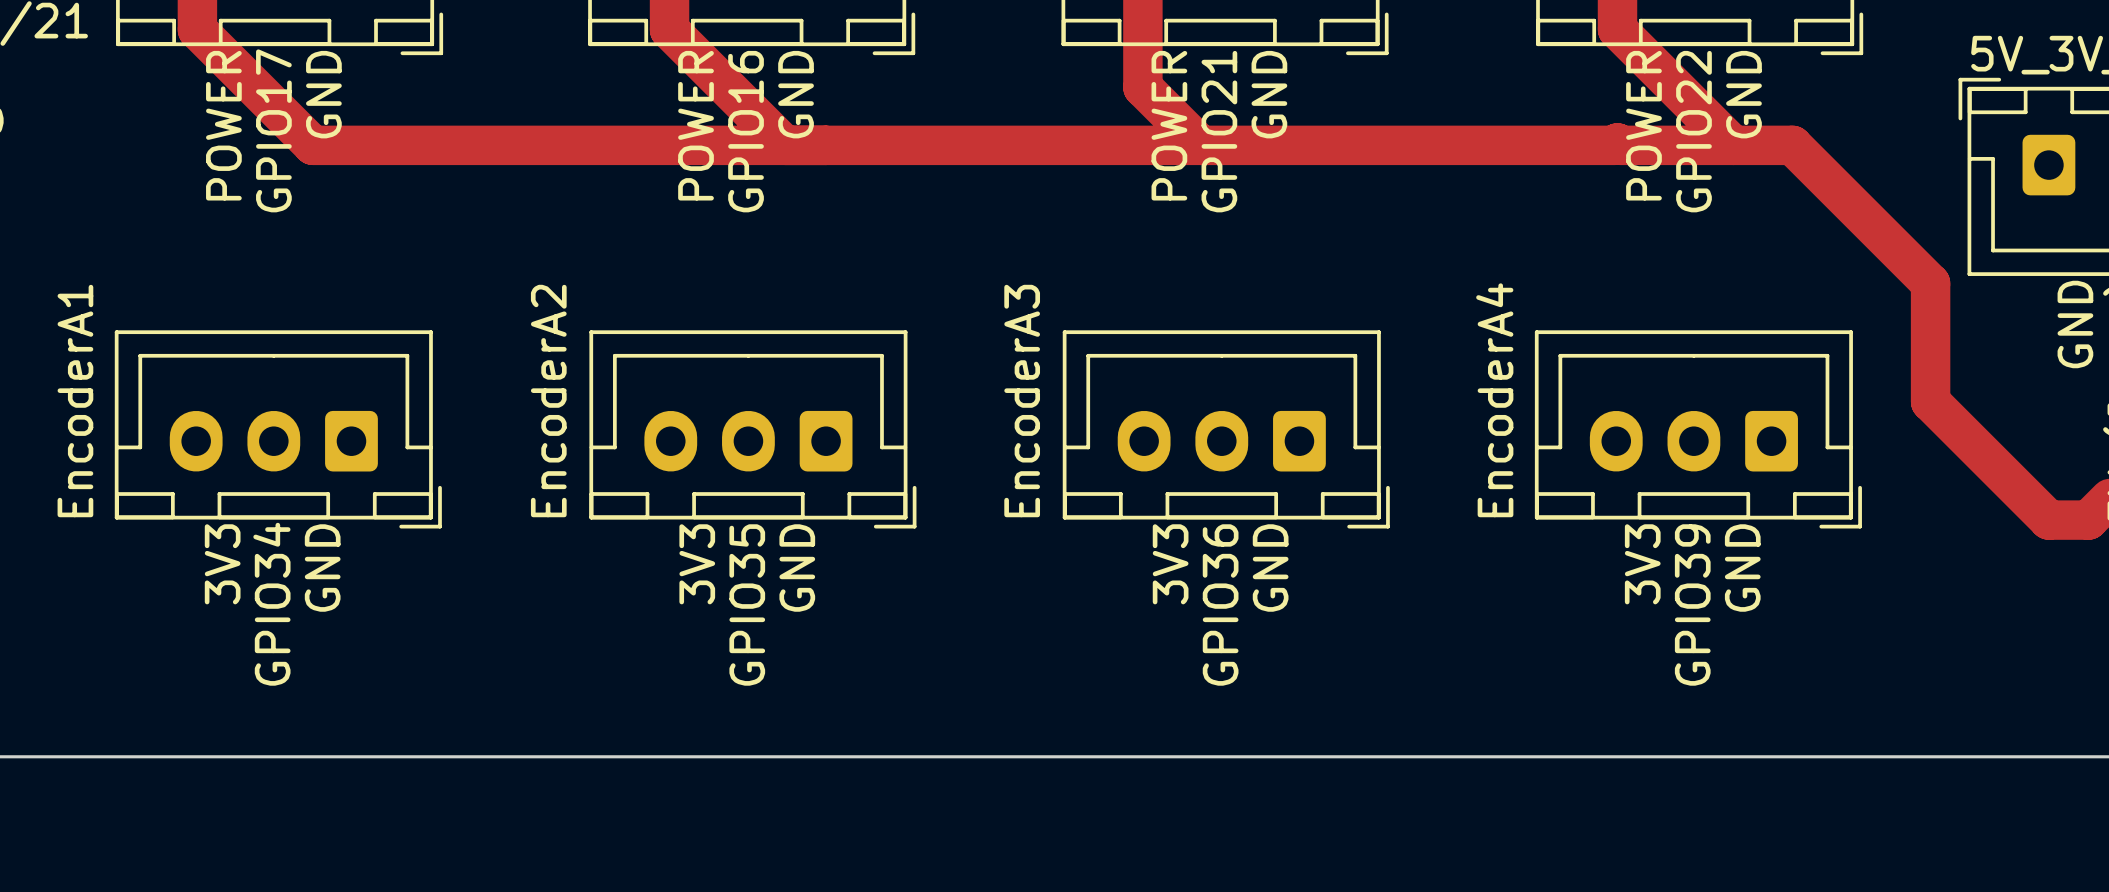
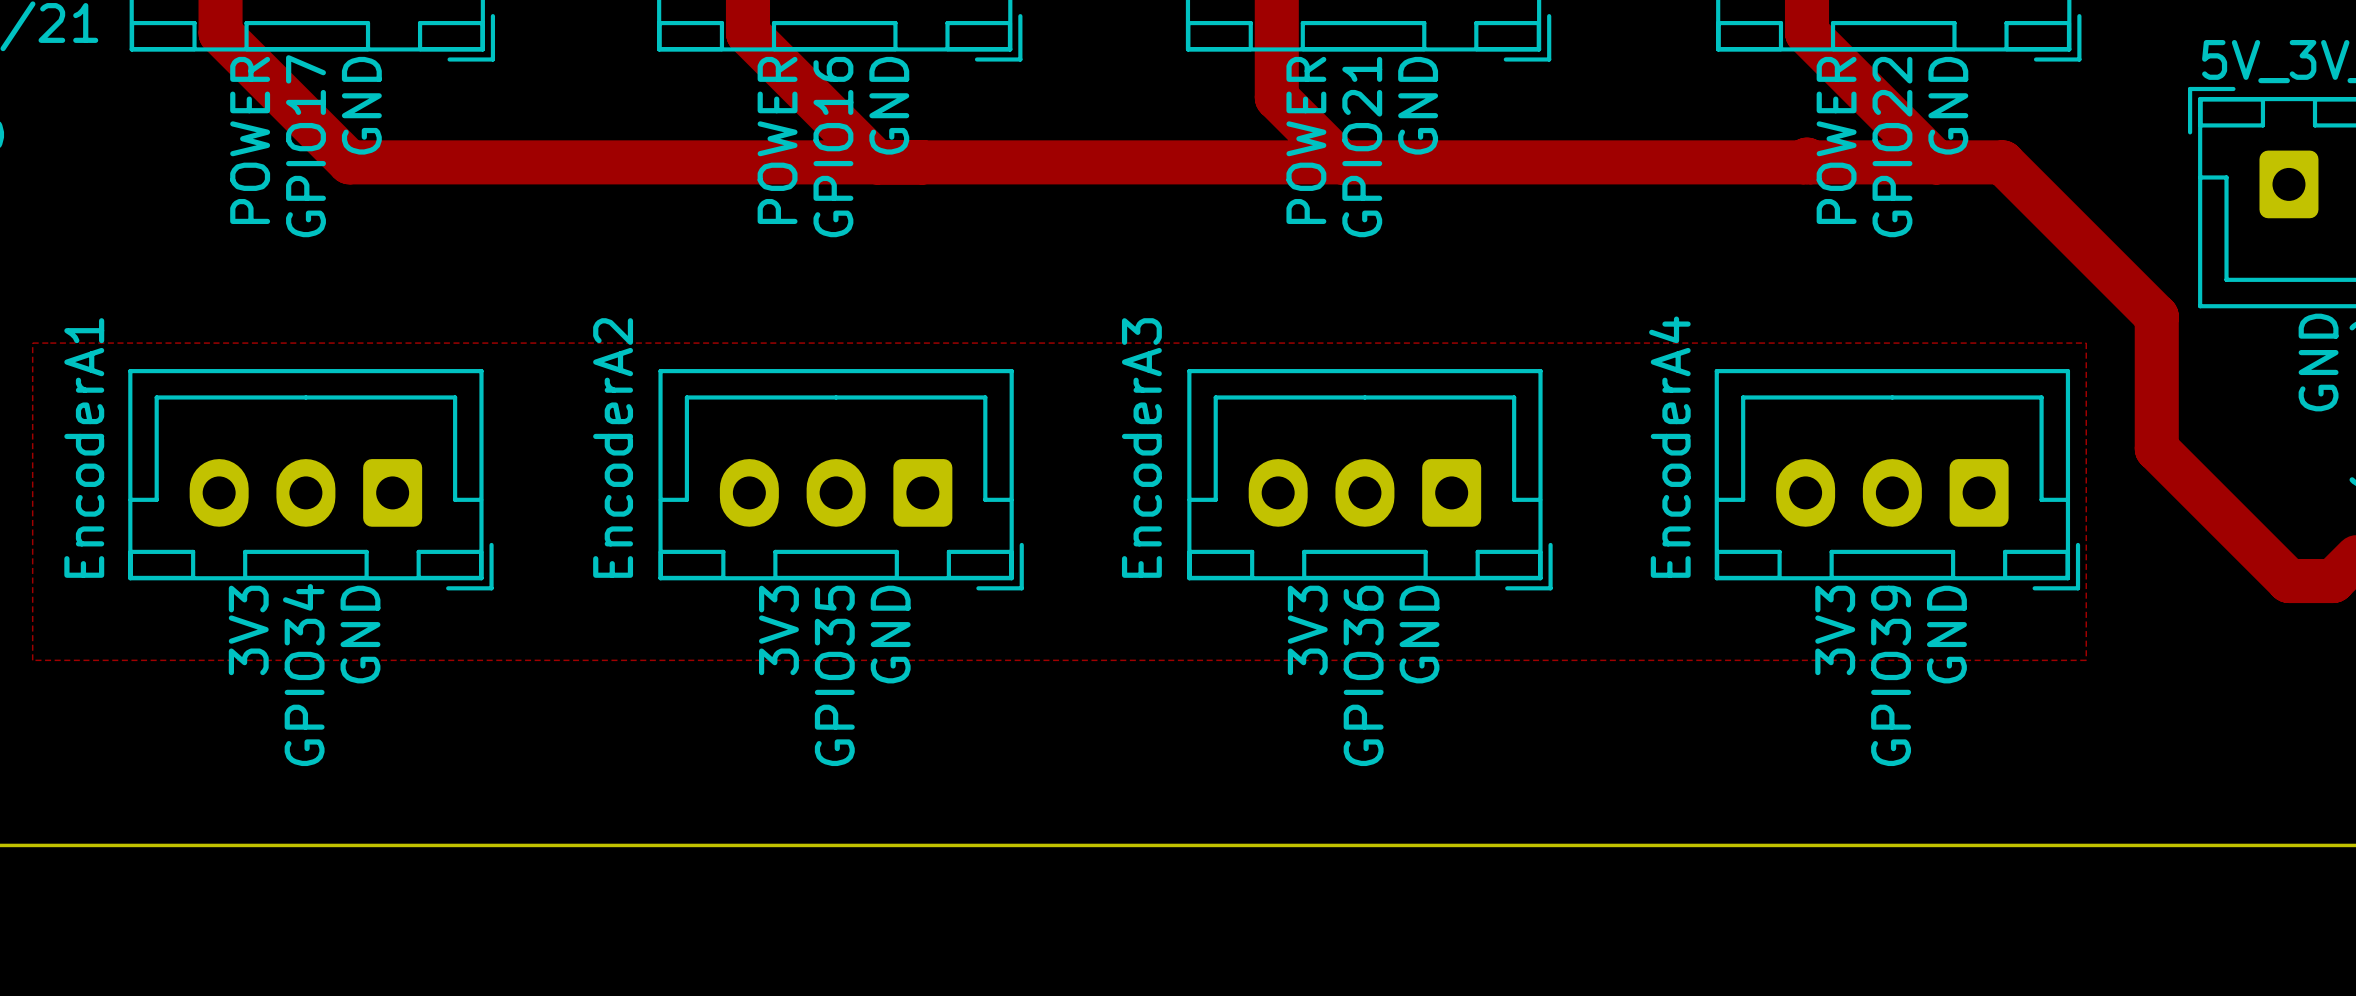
zone outline: none -> (32, 343) (32, 660) (2086, 660) (2086, 343) (32, 343)

